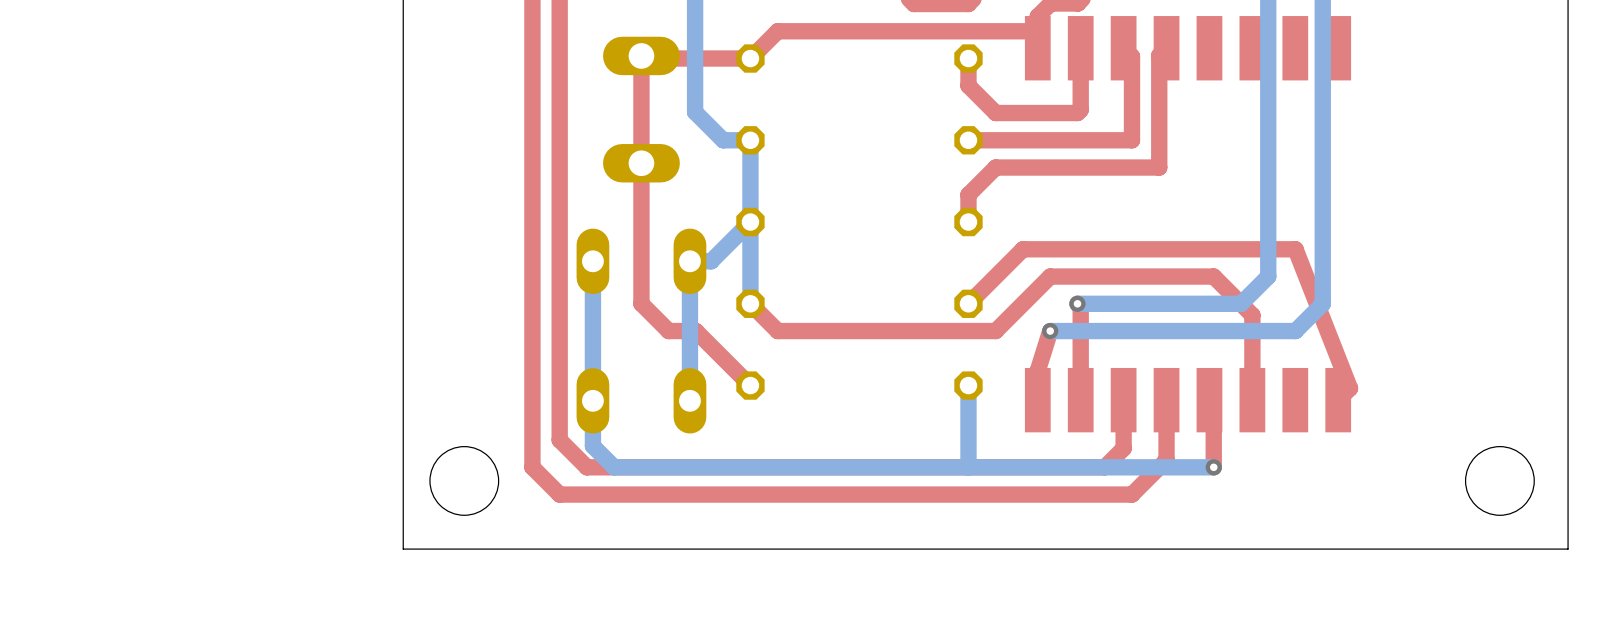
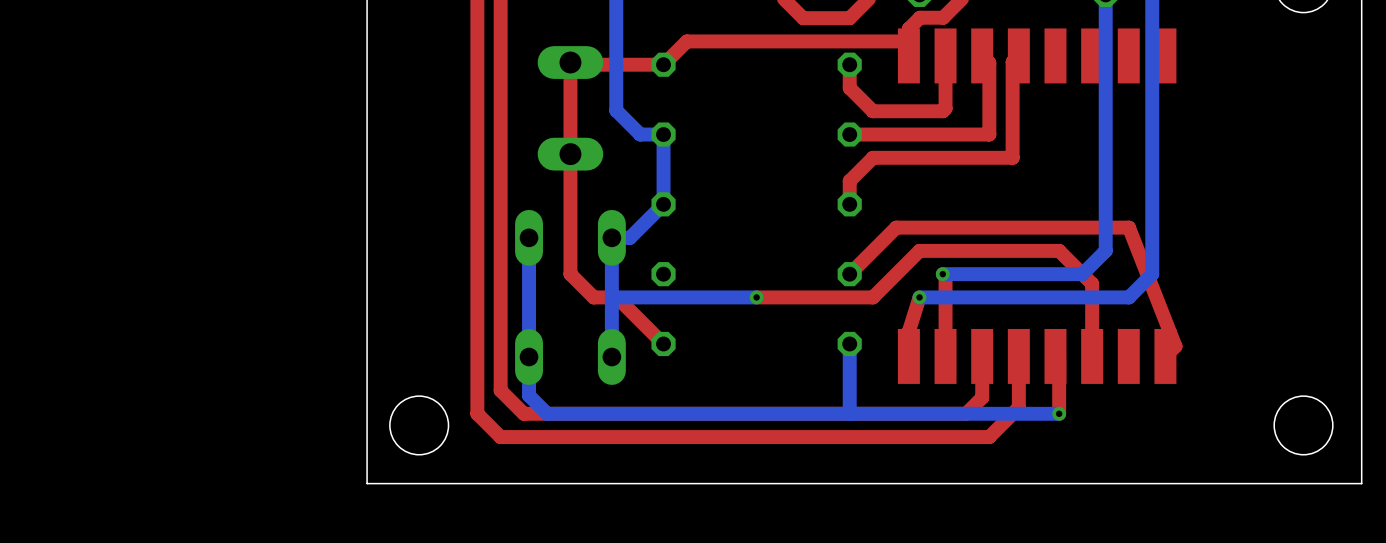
bottom track: (750, 222) (750, 303) -> none
top track: (750, 303) (777, 331) (859, 331) -> none
bottom track: none -> (756, 297) (611, 297)
via: none -> (756, 297)

